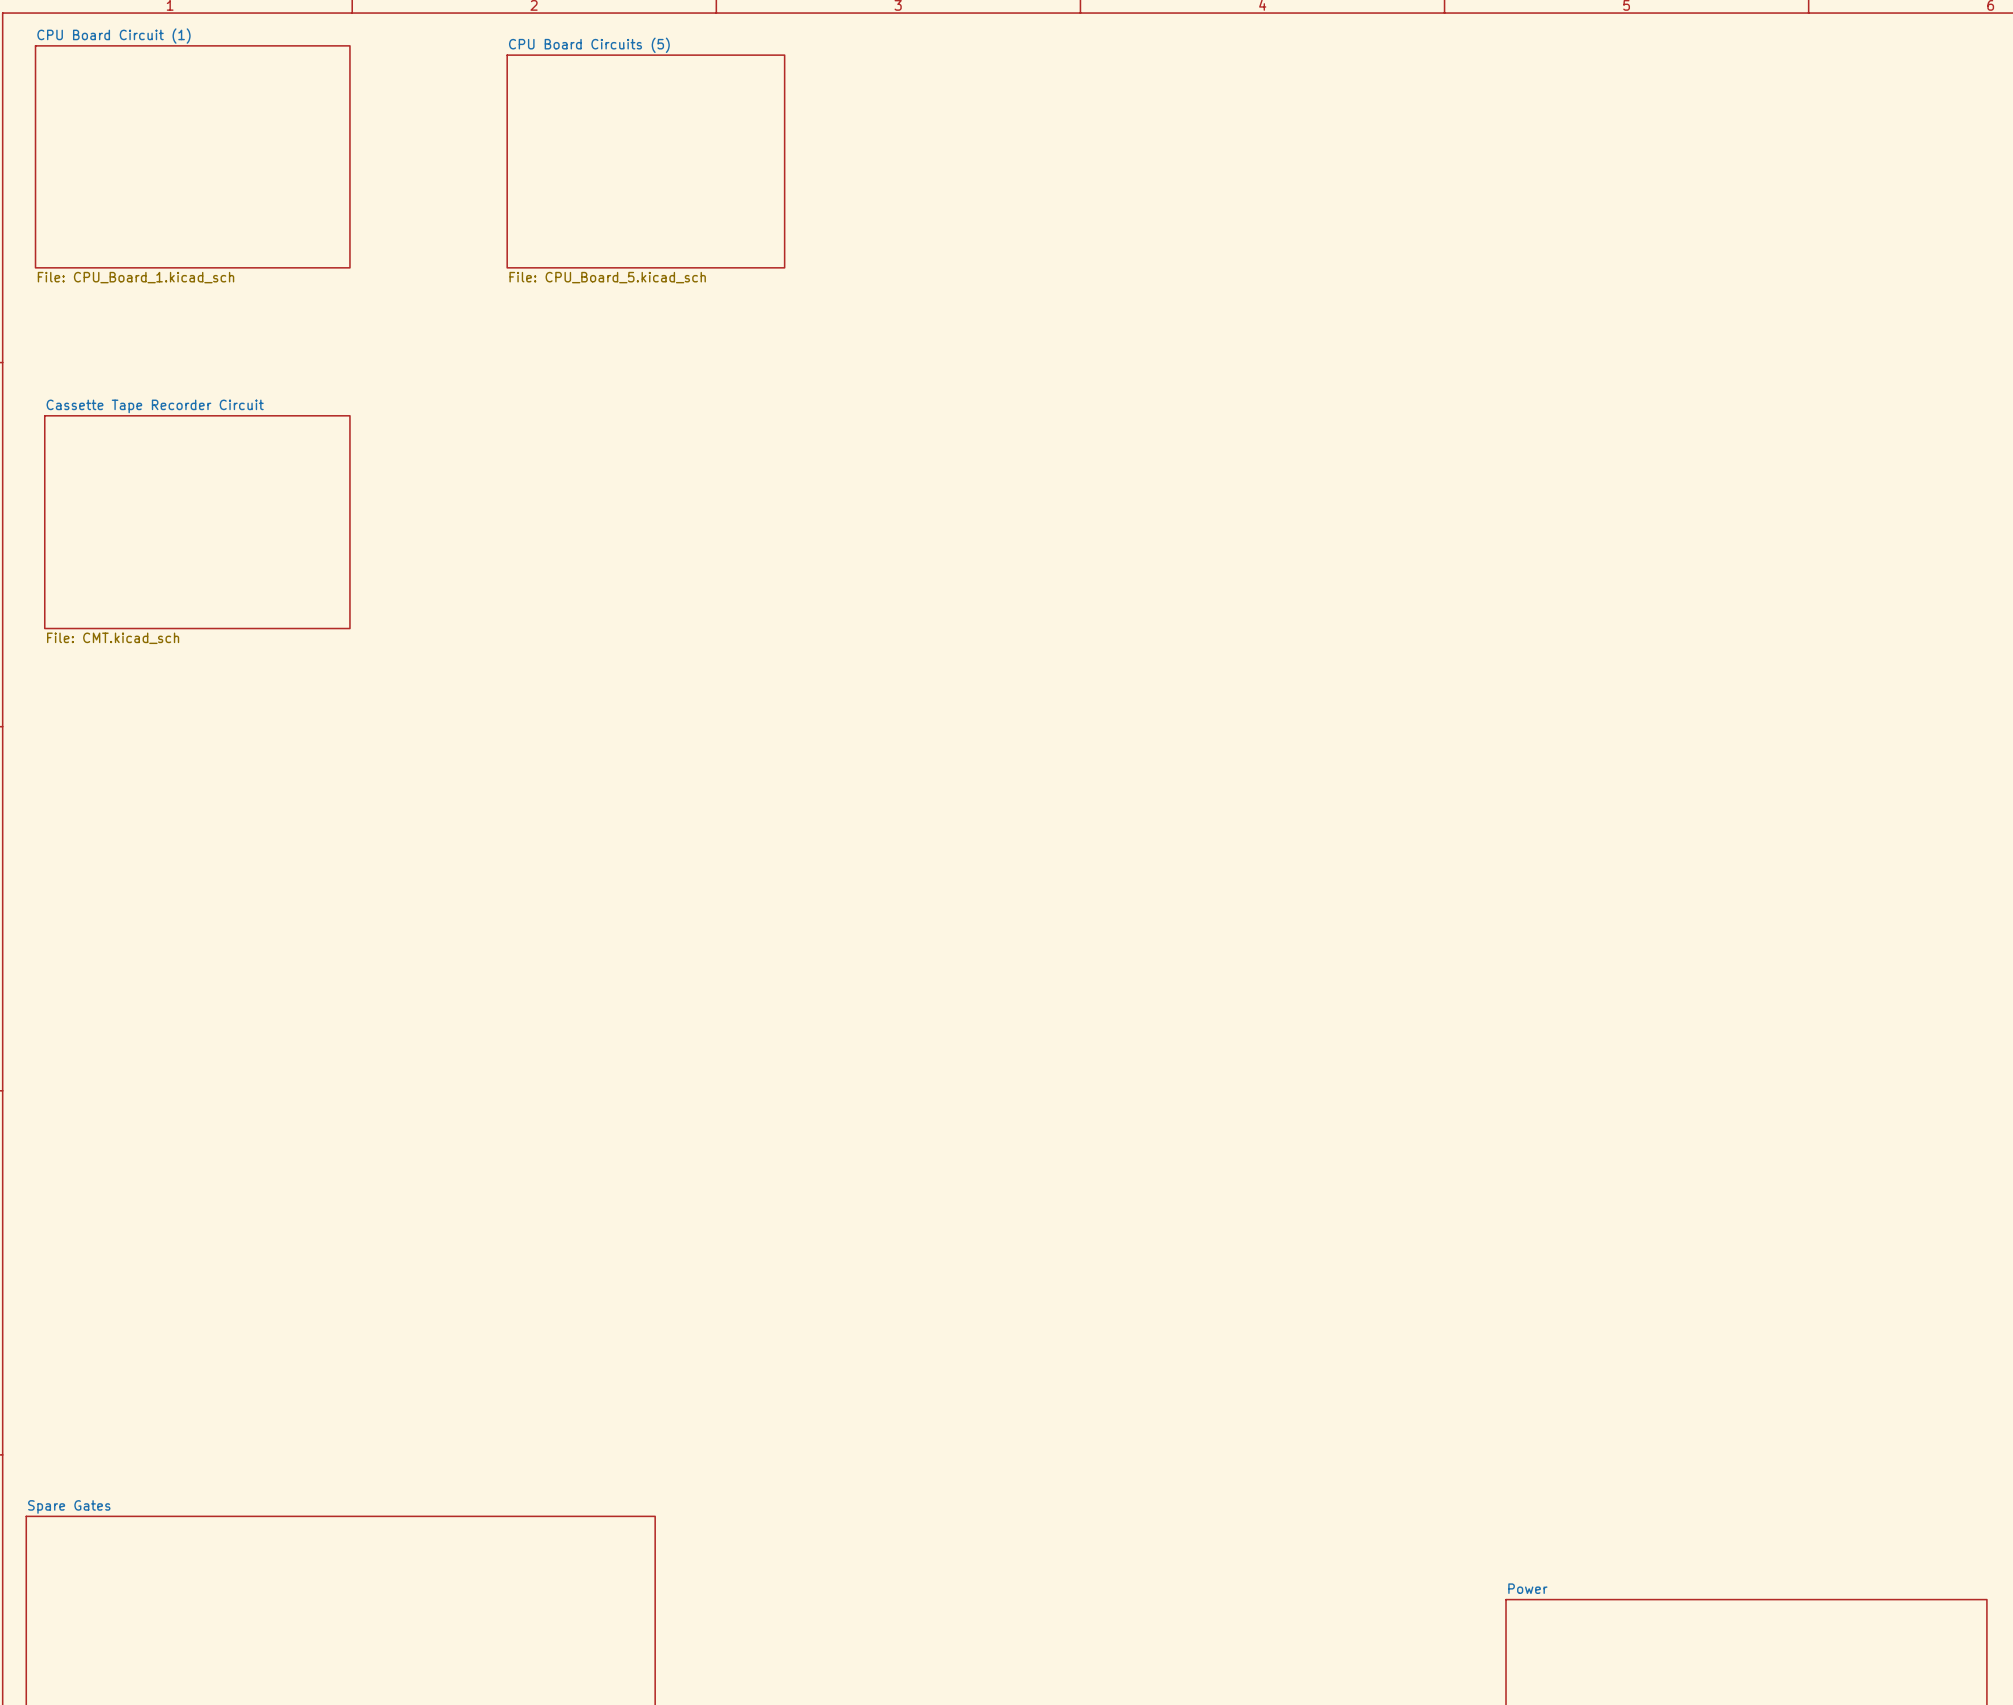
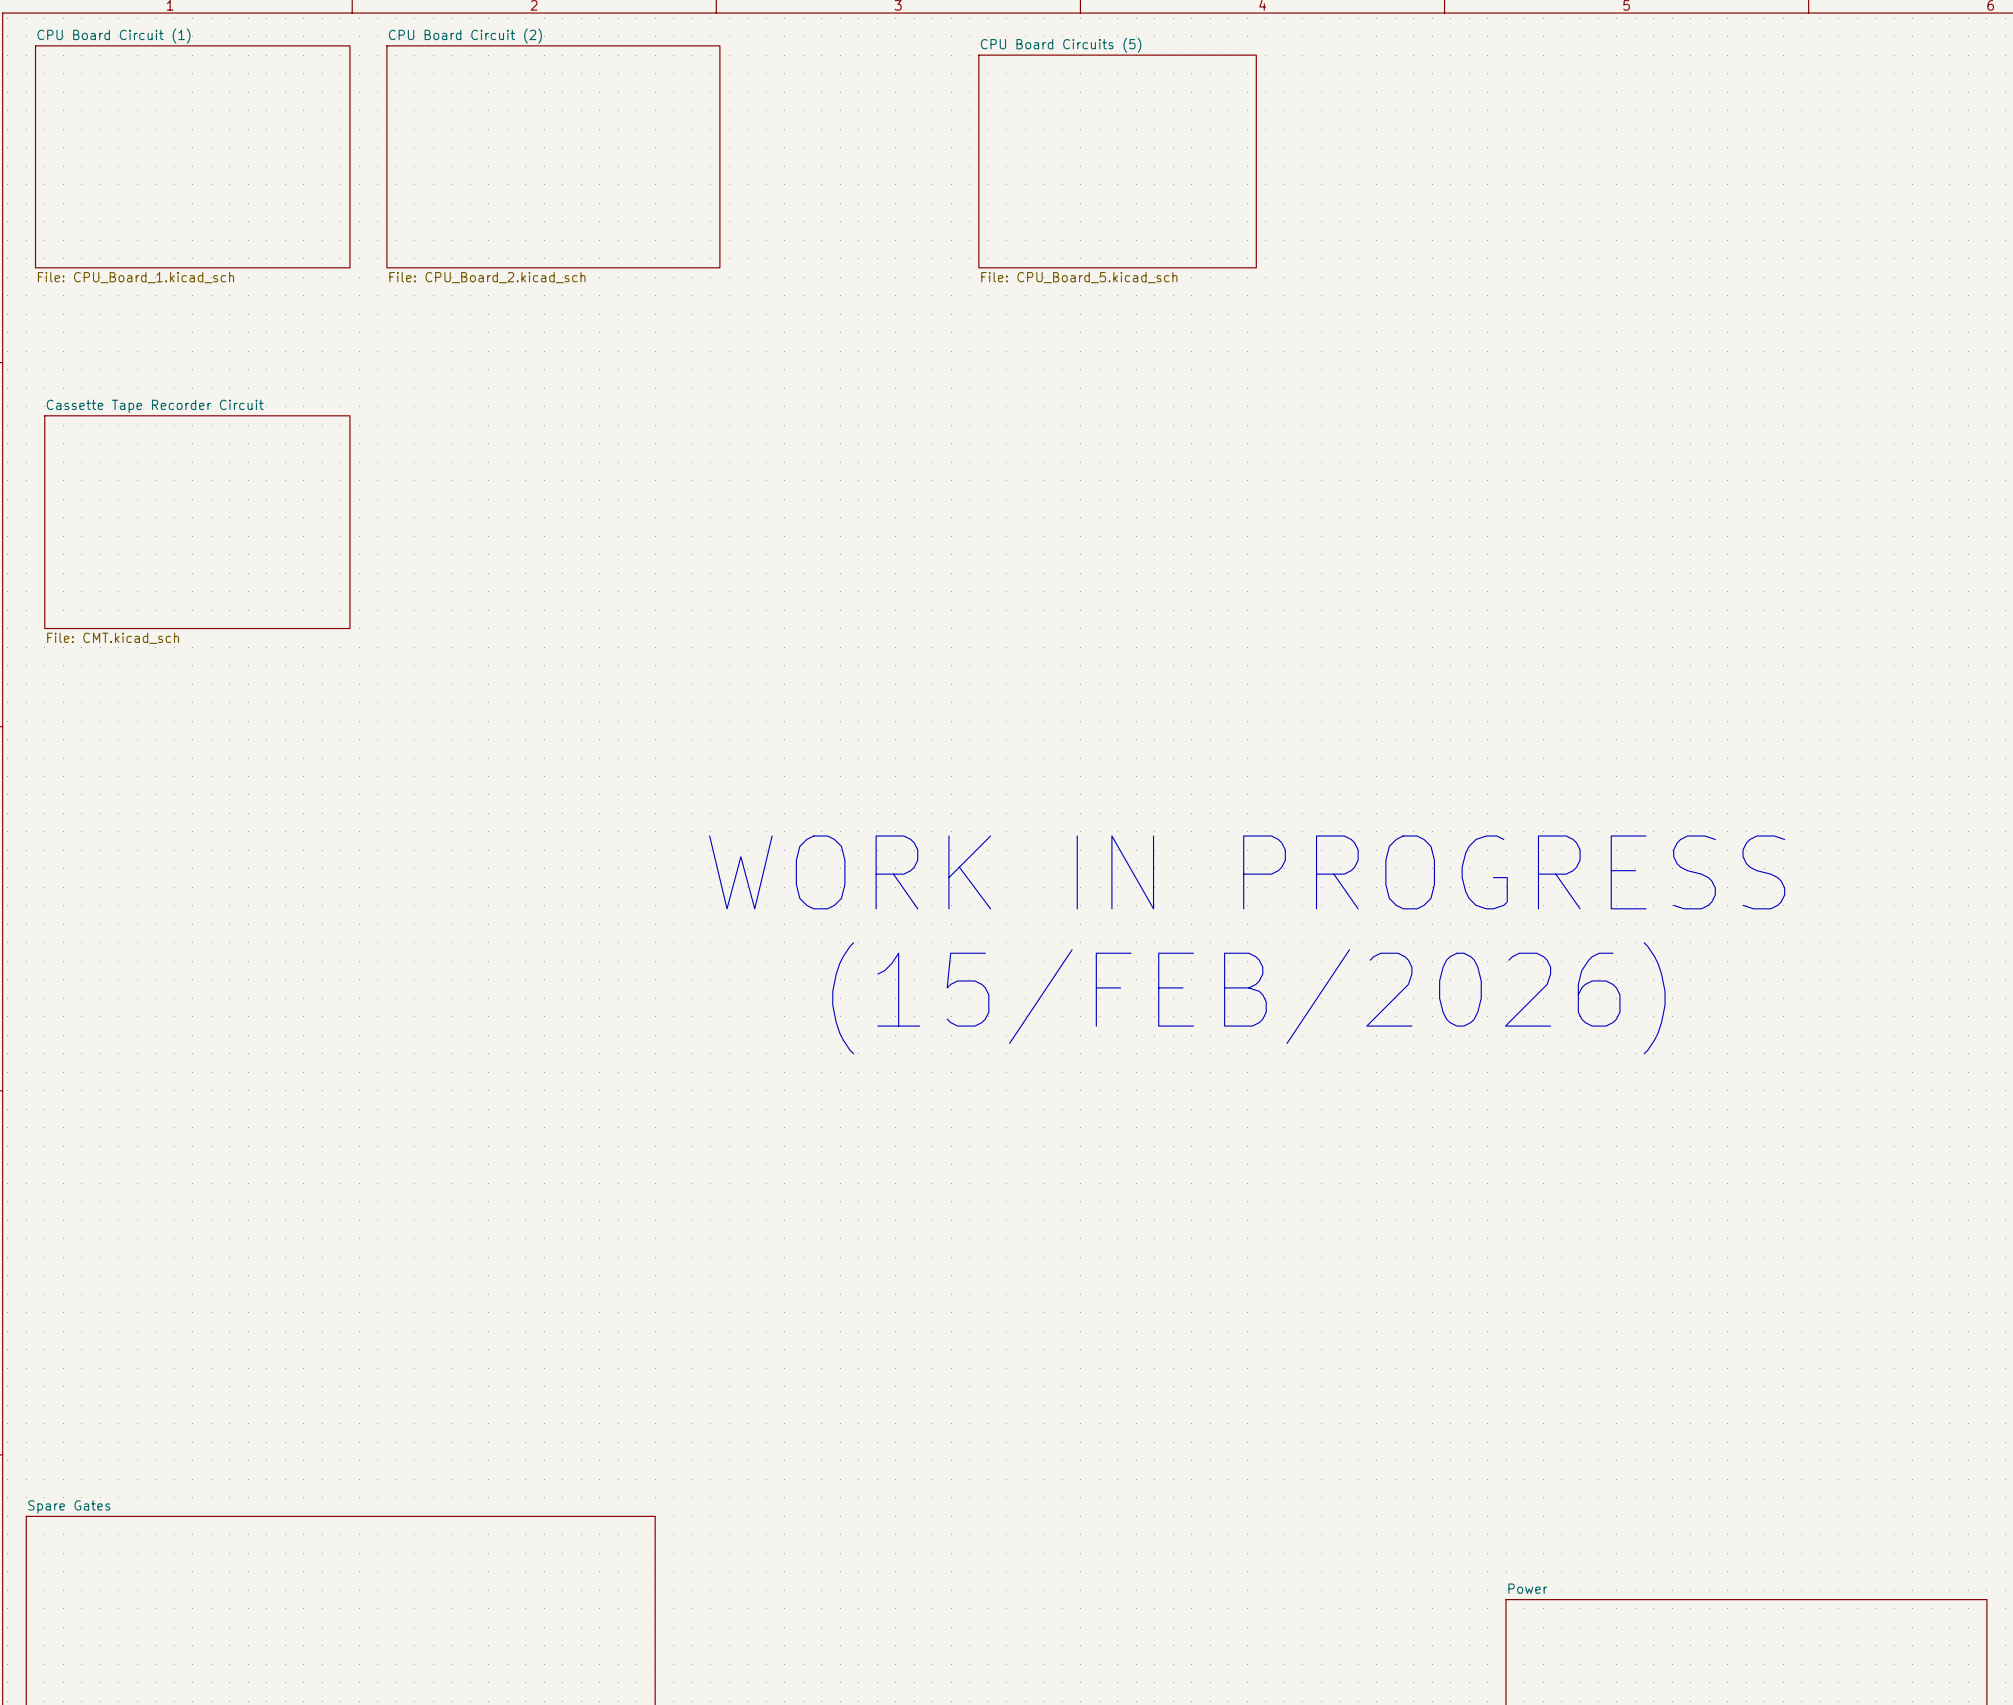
sheet CPU Board Circuit (2): none -> File: CPU_Board_2.kicad_sch (553, 156)
sheet CPU Board Circuits (5) position: (645, 161) -> (1117, 161)
text: none -> WORK IN PROGRESS (1247, 872)
text: none -> (15/FEB/2026) (1248, 998)

